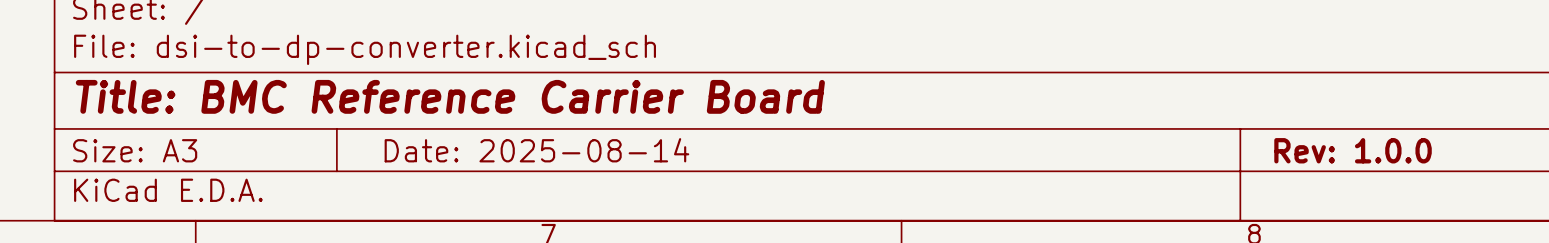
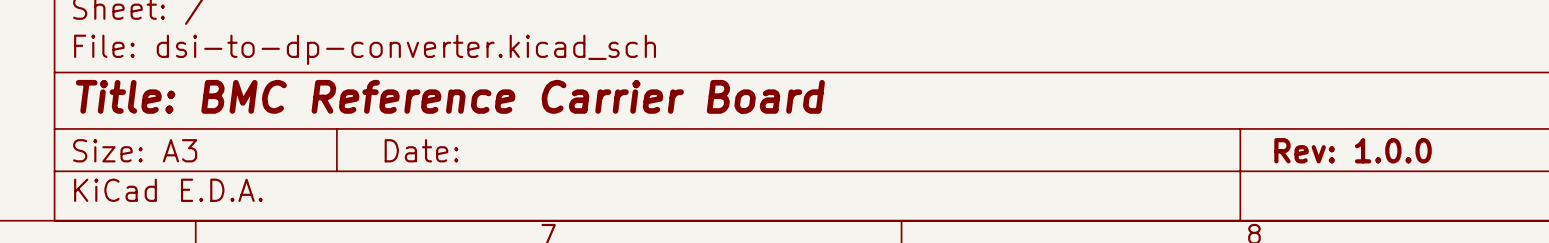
title block: Date: 2025-08-14 (536, 150) -> Date: (421, 150)

